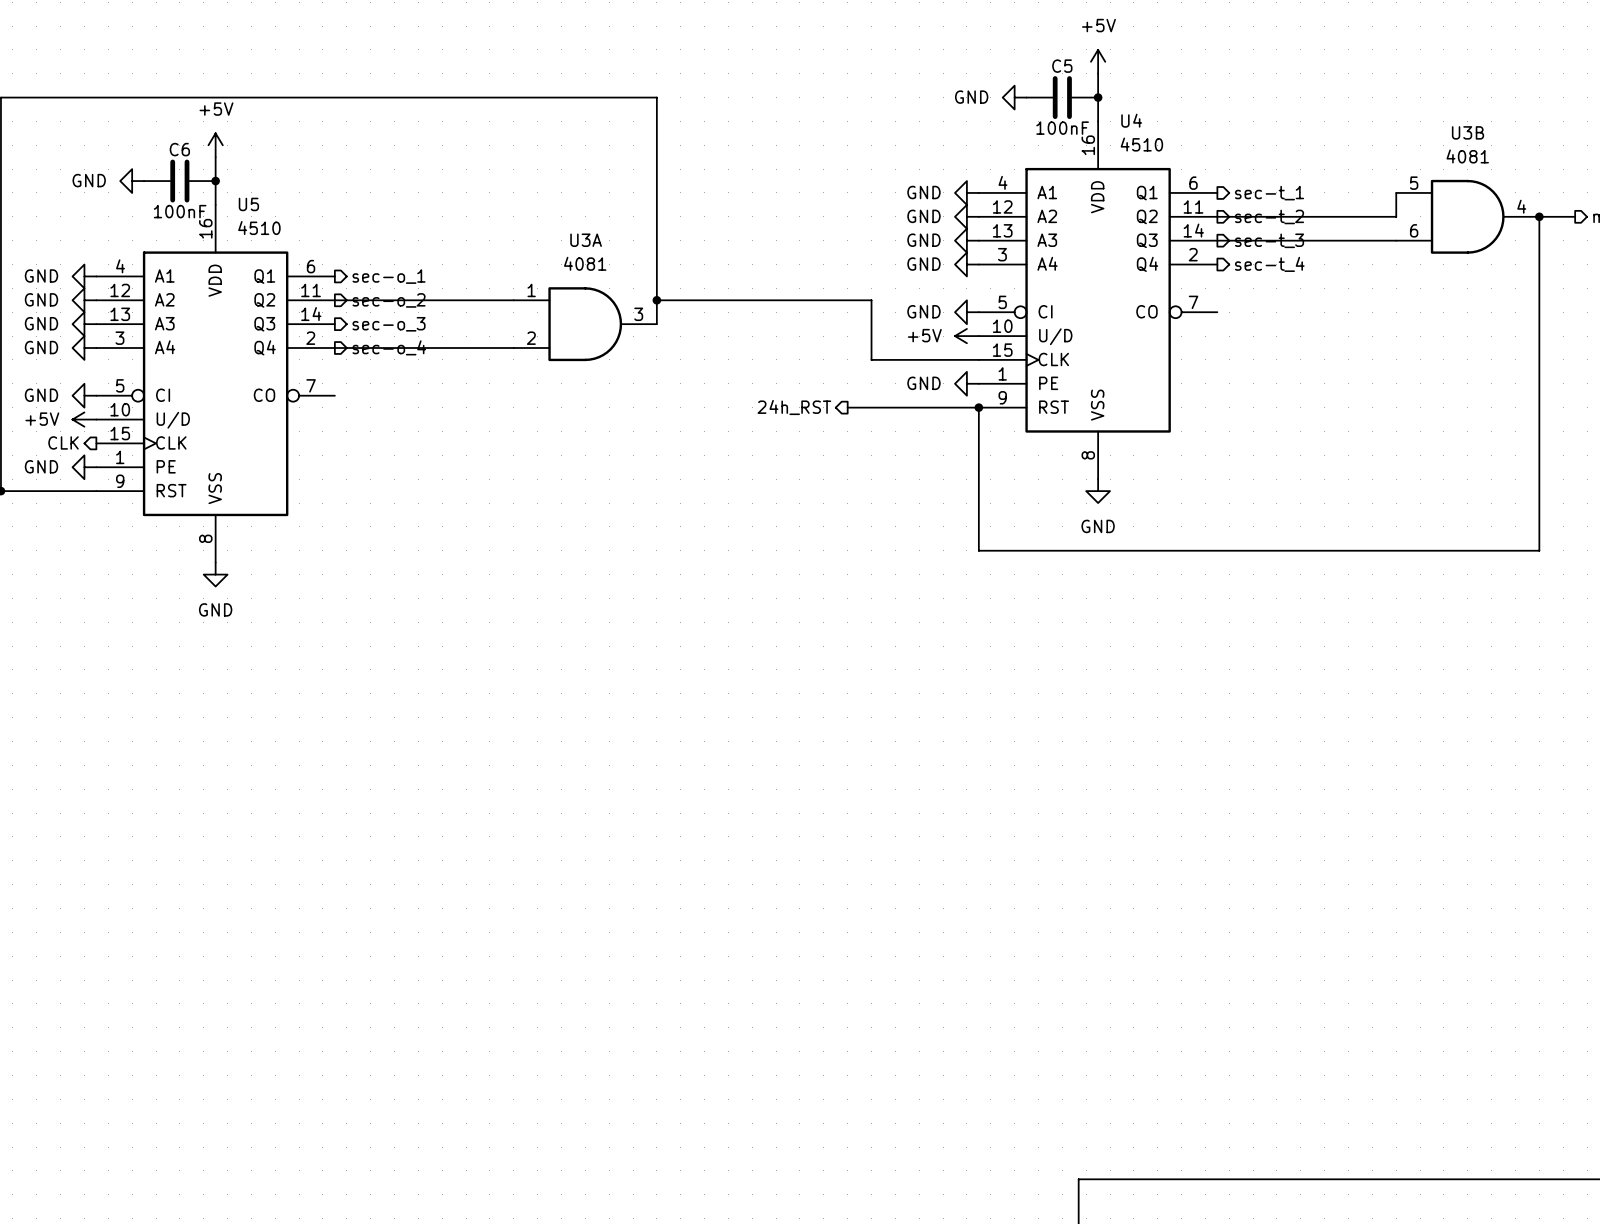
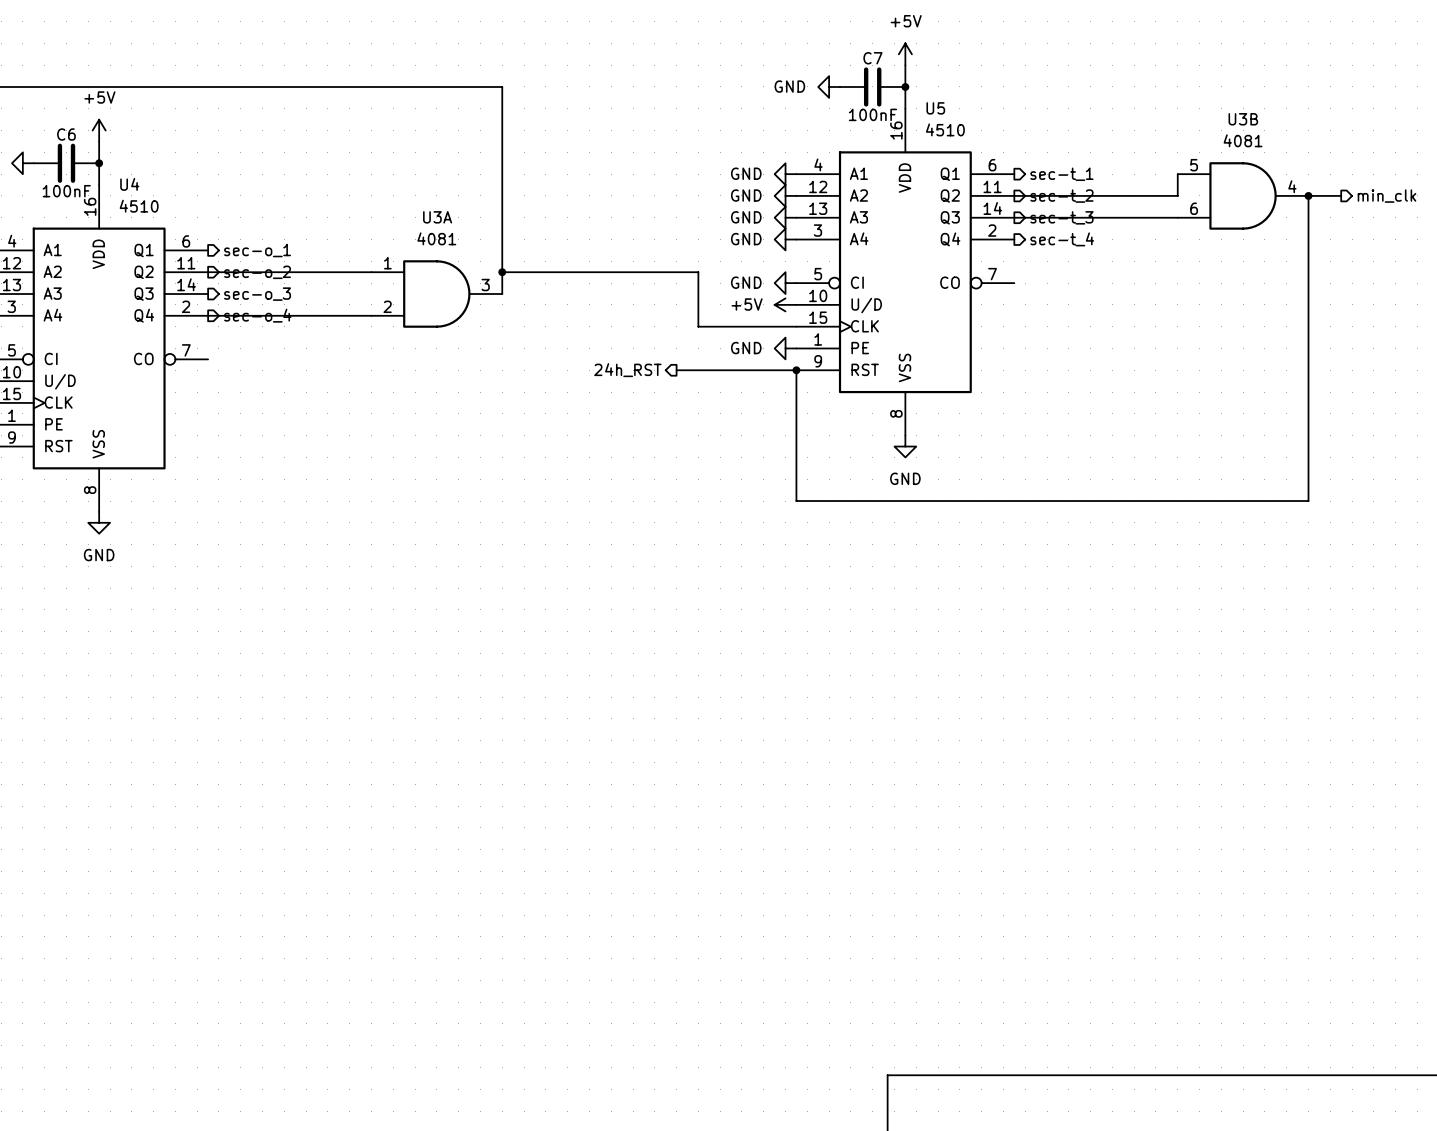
C5 name: C5 (1062, 66) -> C7 (872, 58)
U4 name: U4 (1131, 120) -> U5 (935, 108)
U5 name: U5 (248, 204) -> U4 (129, 184)

